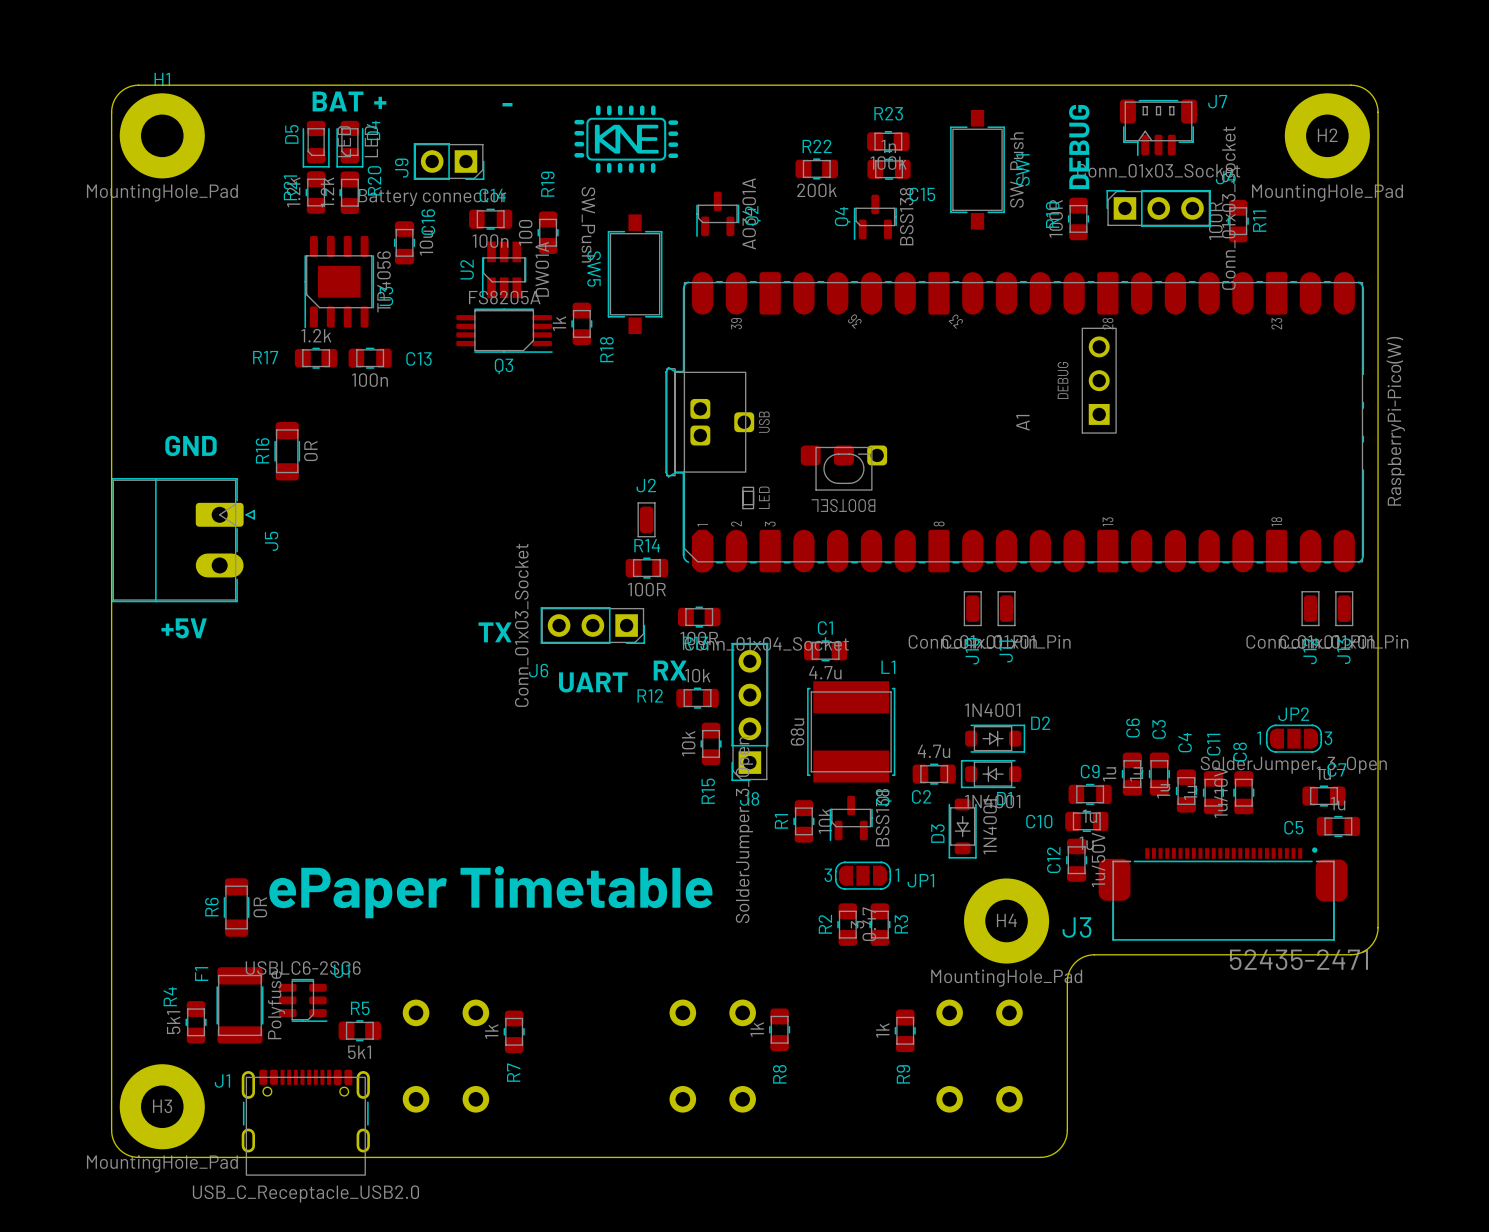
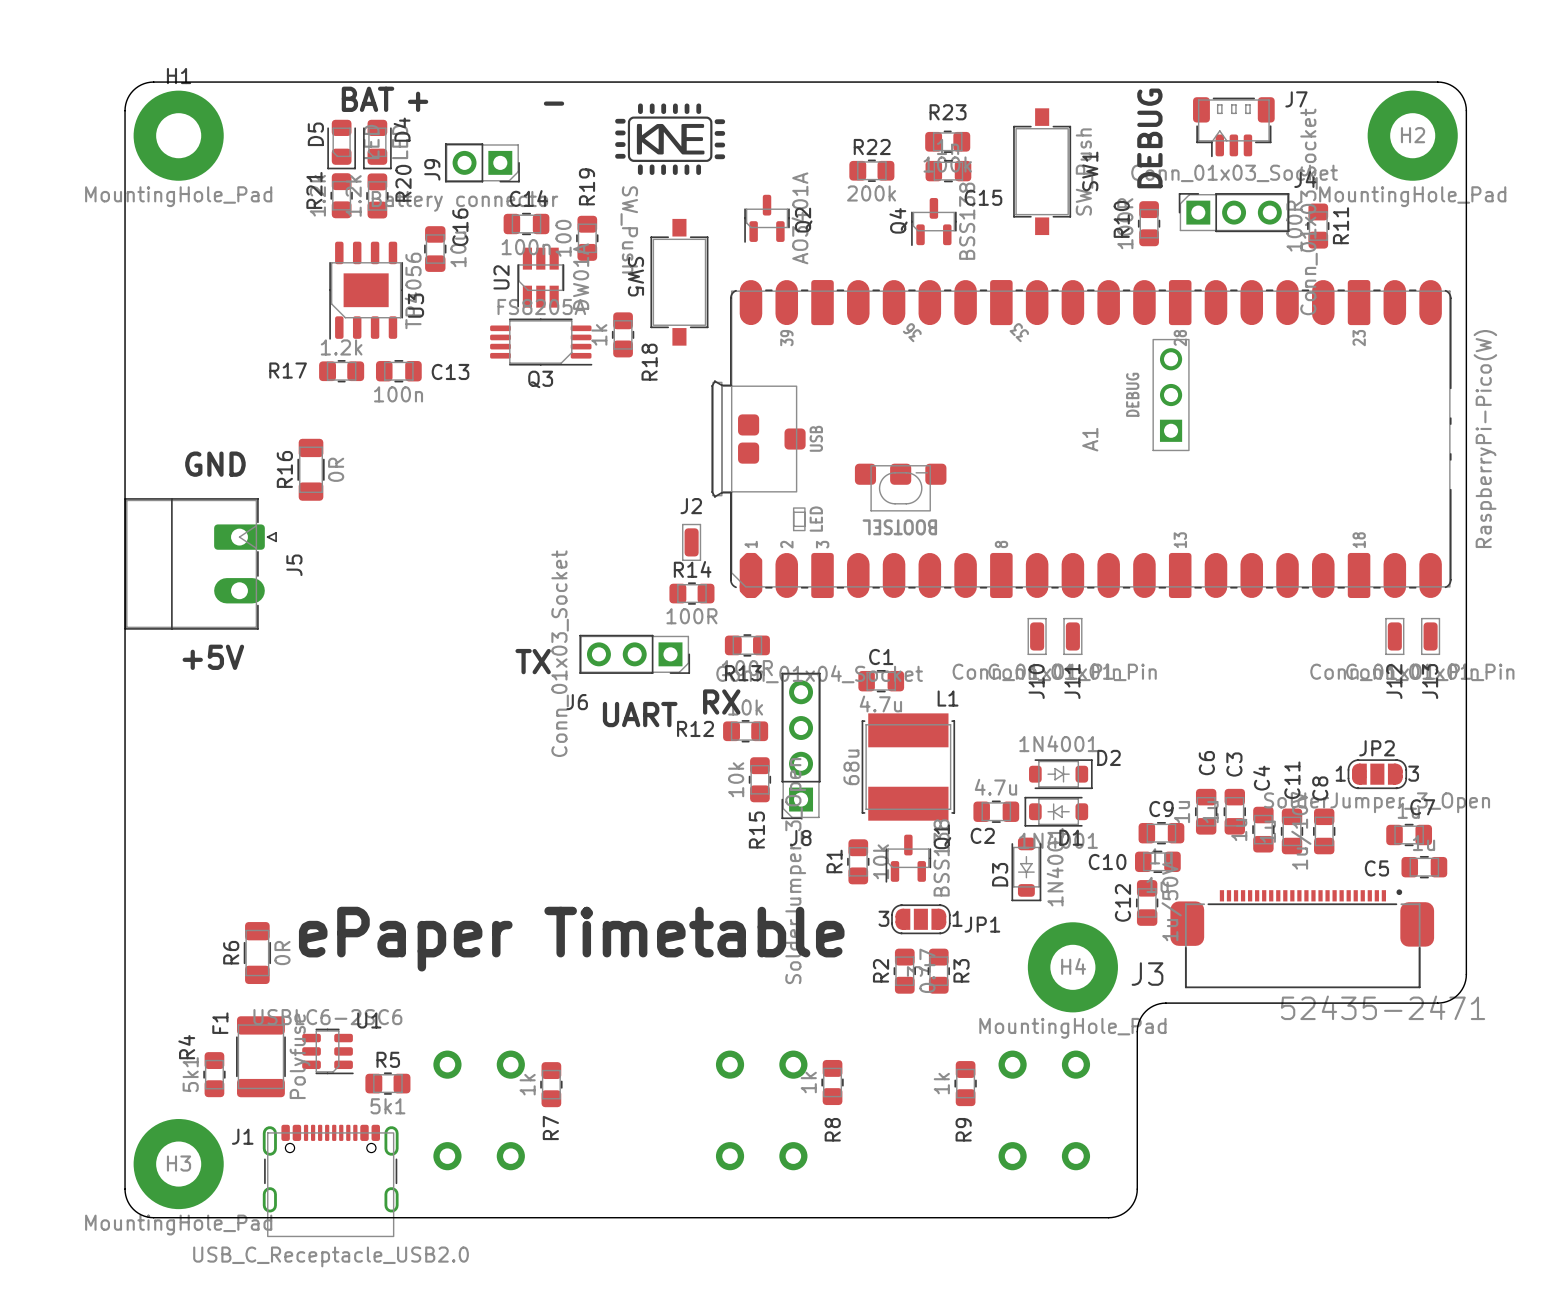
A1 footprint: [665, 272, 1365, 573] -> [711, 280, 1452, 599]

